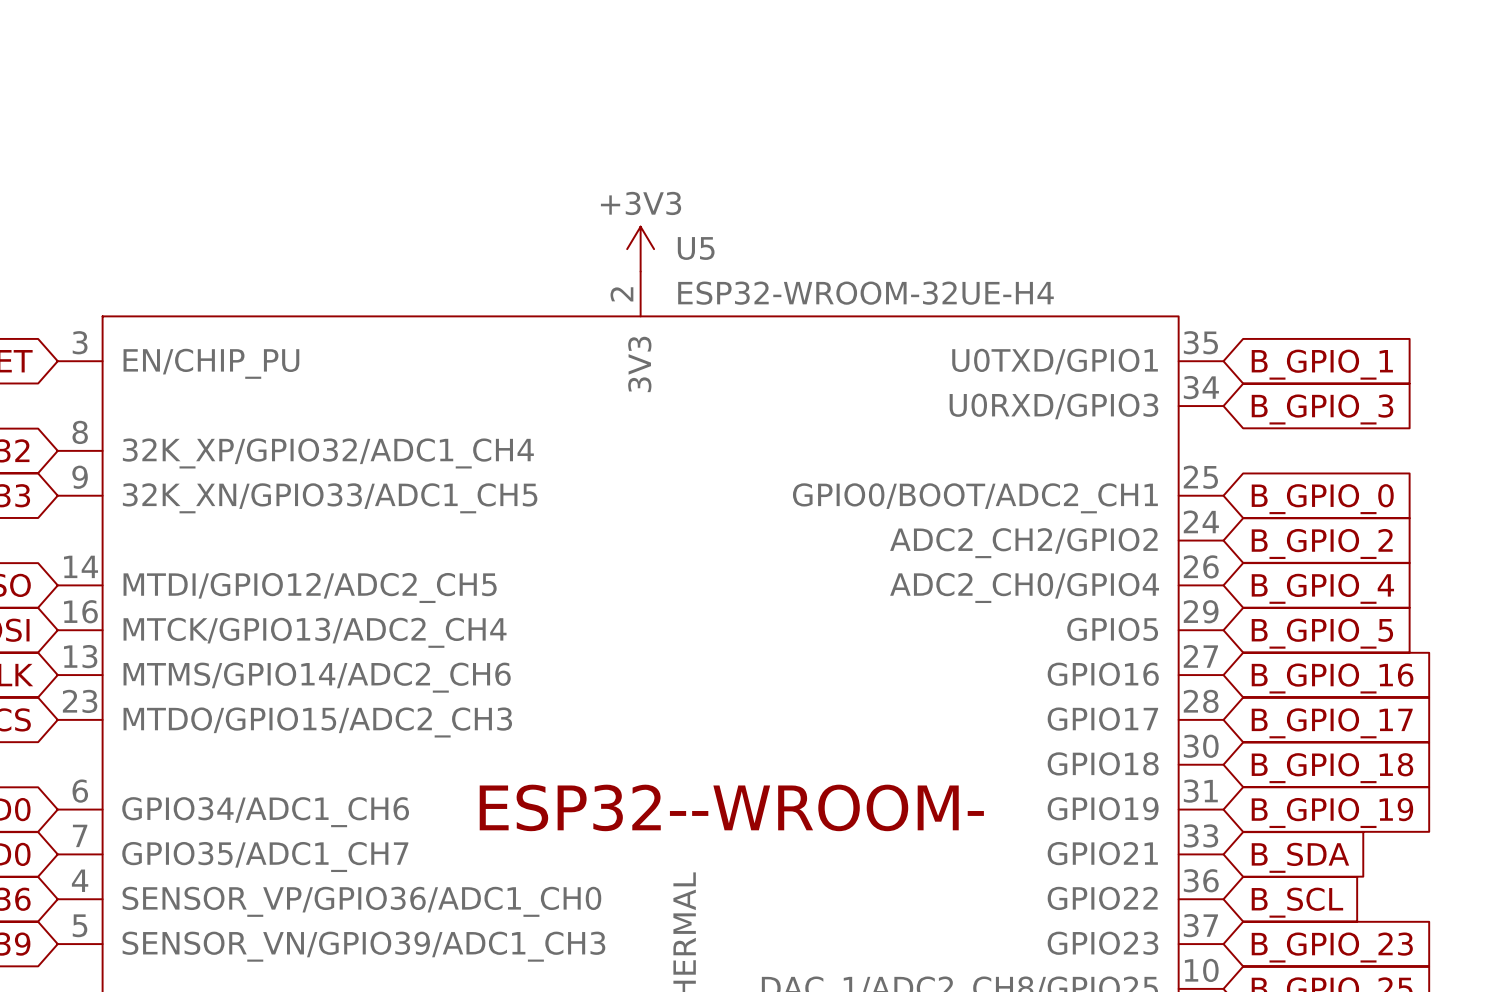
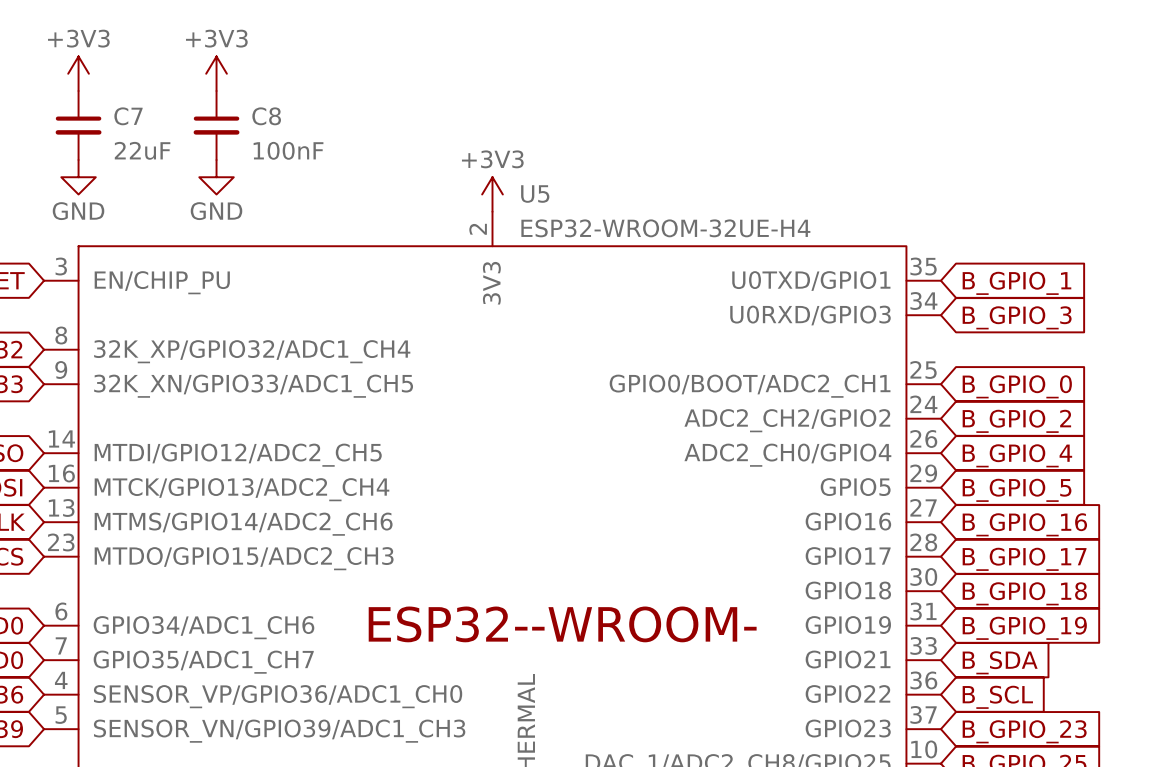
power symbol: none -> +3V3 (78, 73)
power symbol: none -> +3V3 (216, 73)
C7: none -> 22uF (78, 125)
C8: none -> 100nF (216, 125)
power symbol: none -> GND (78, 177)
power symbol: none -> GND (216, 177)

